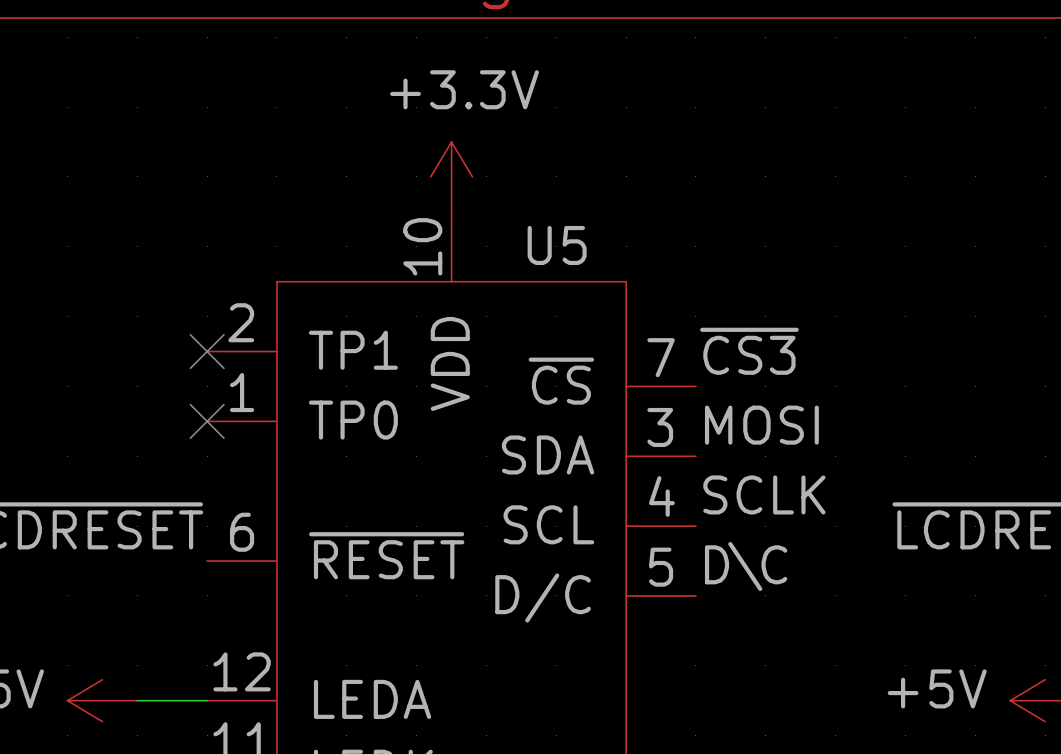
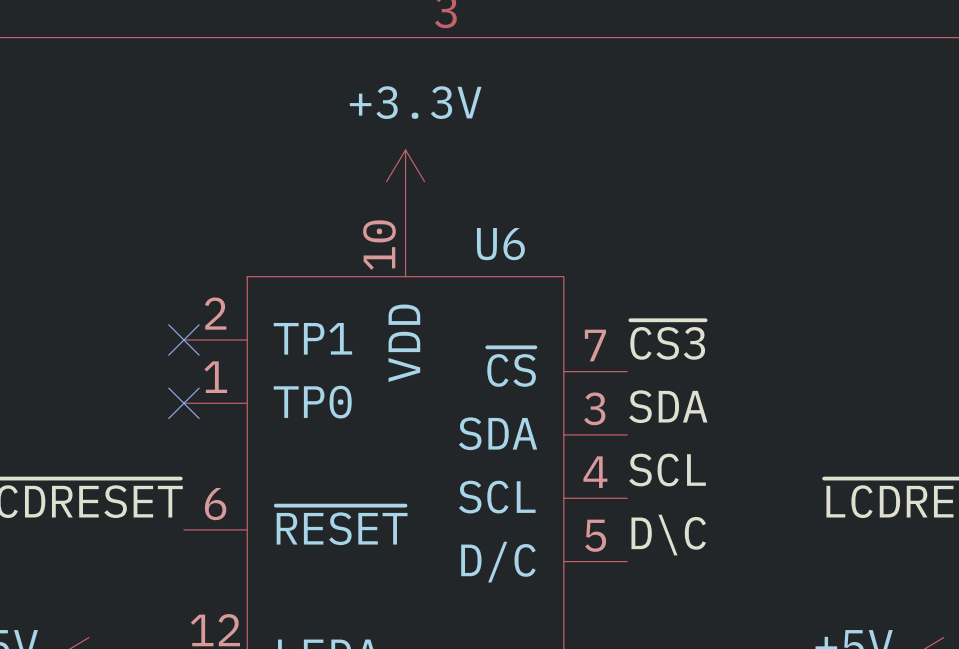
U5 name: U5 (557, 245) -> U6 (500, 244)
label: MOSI (761, 425) -> SDA (668, 406)
label: SCLK (764, 494) -> SCL (667, 470)

